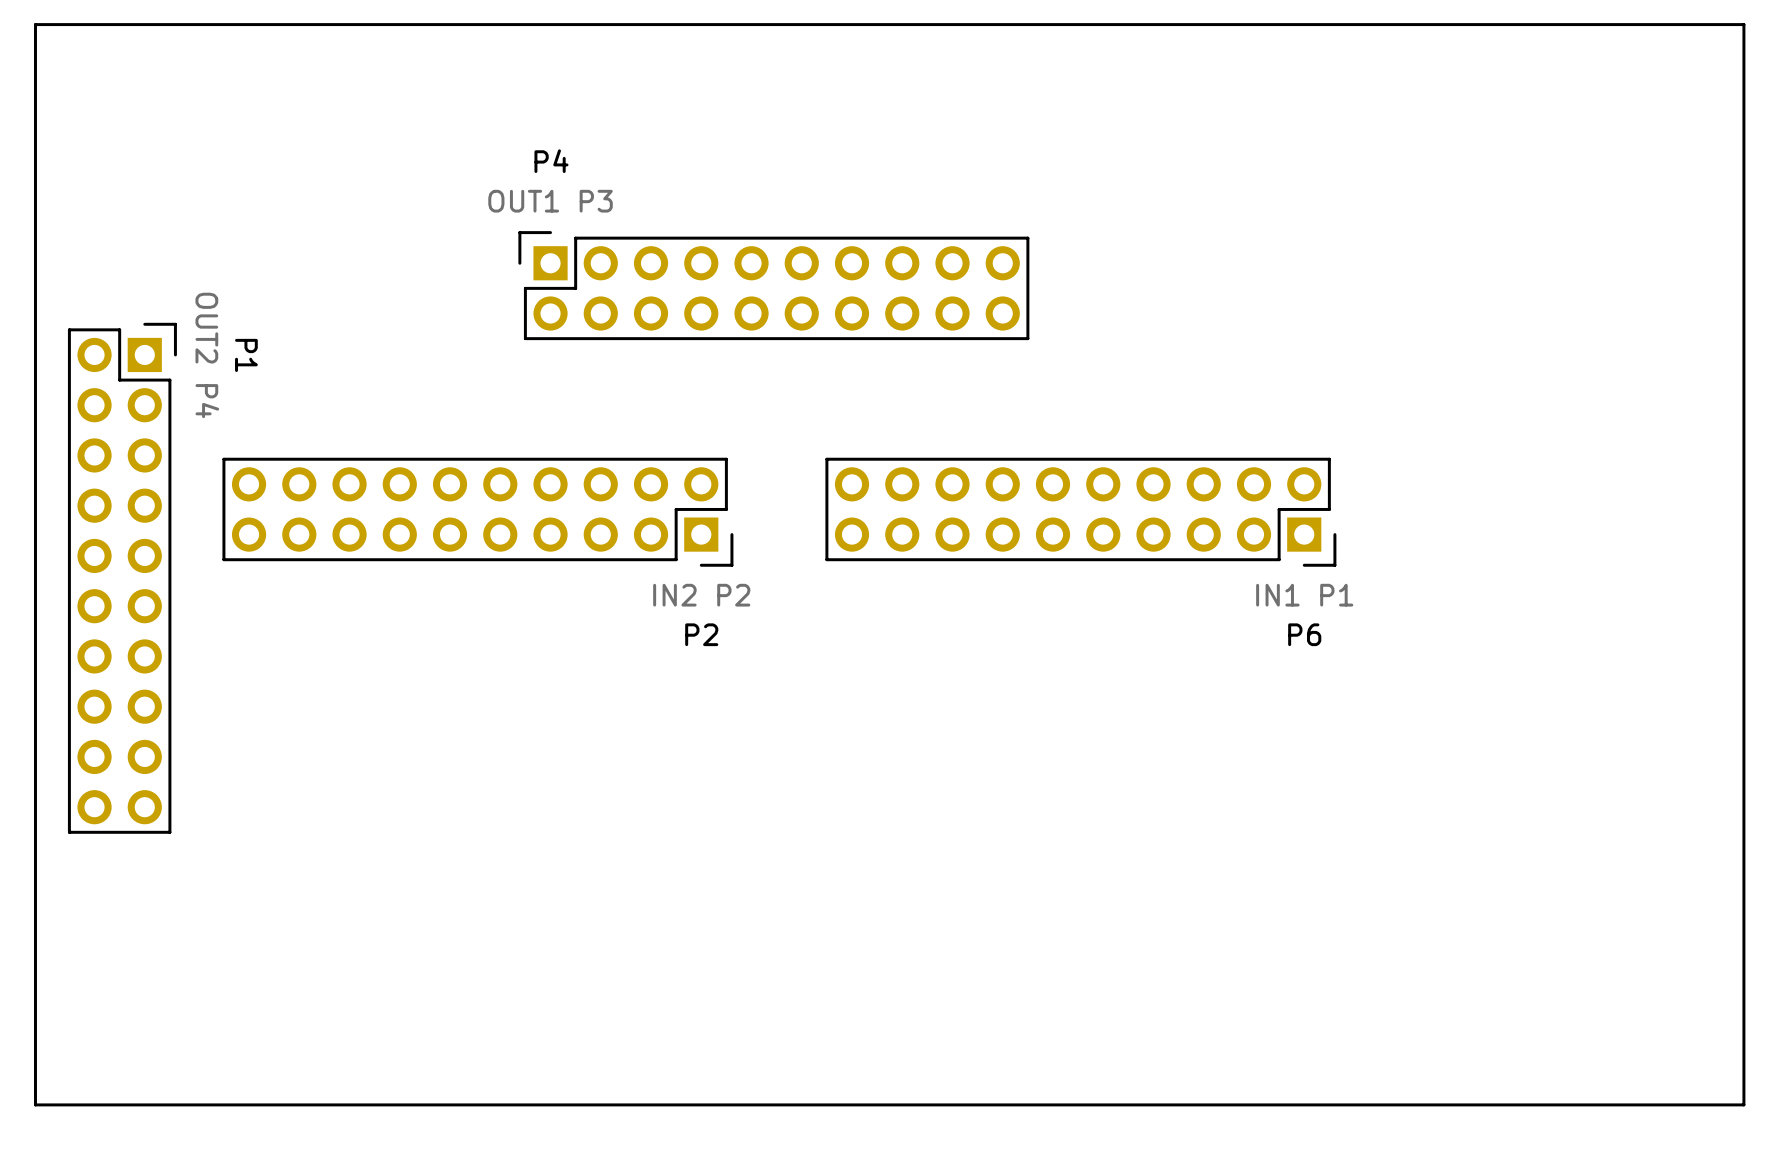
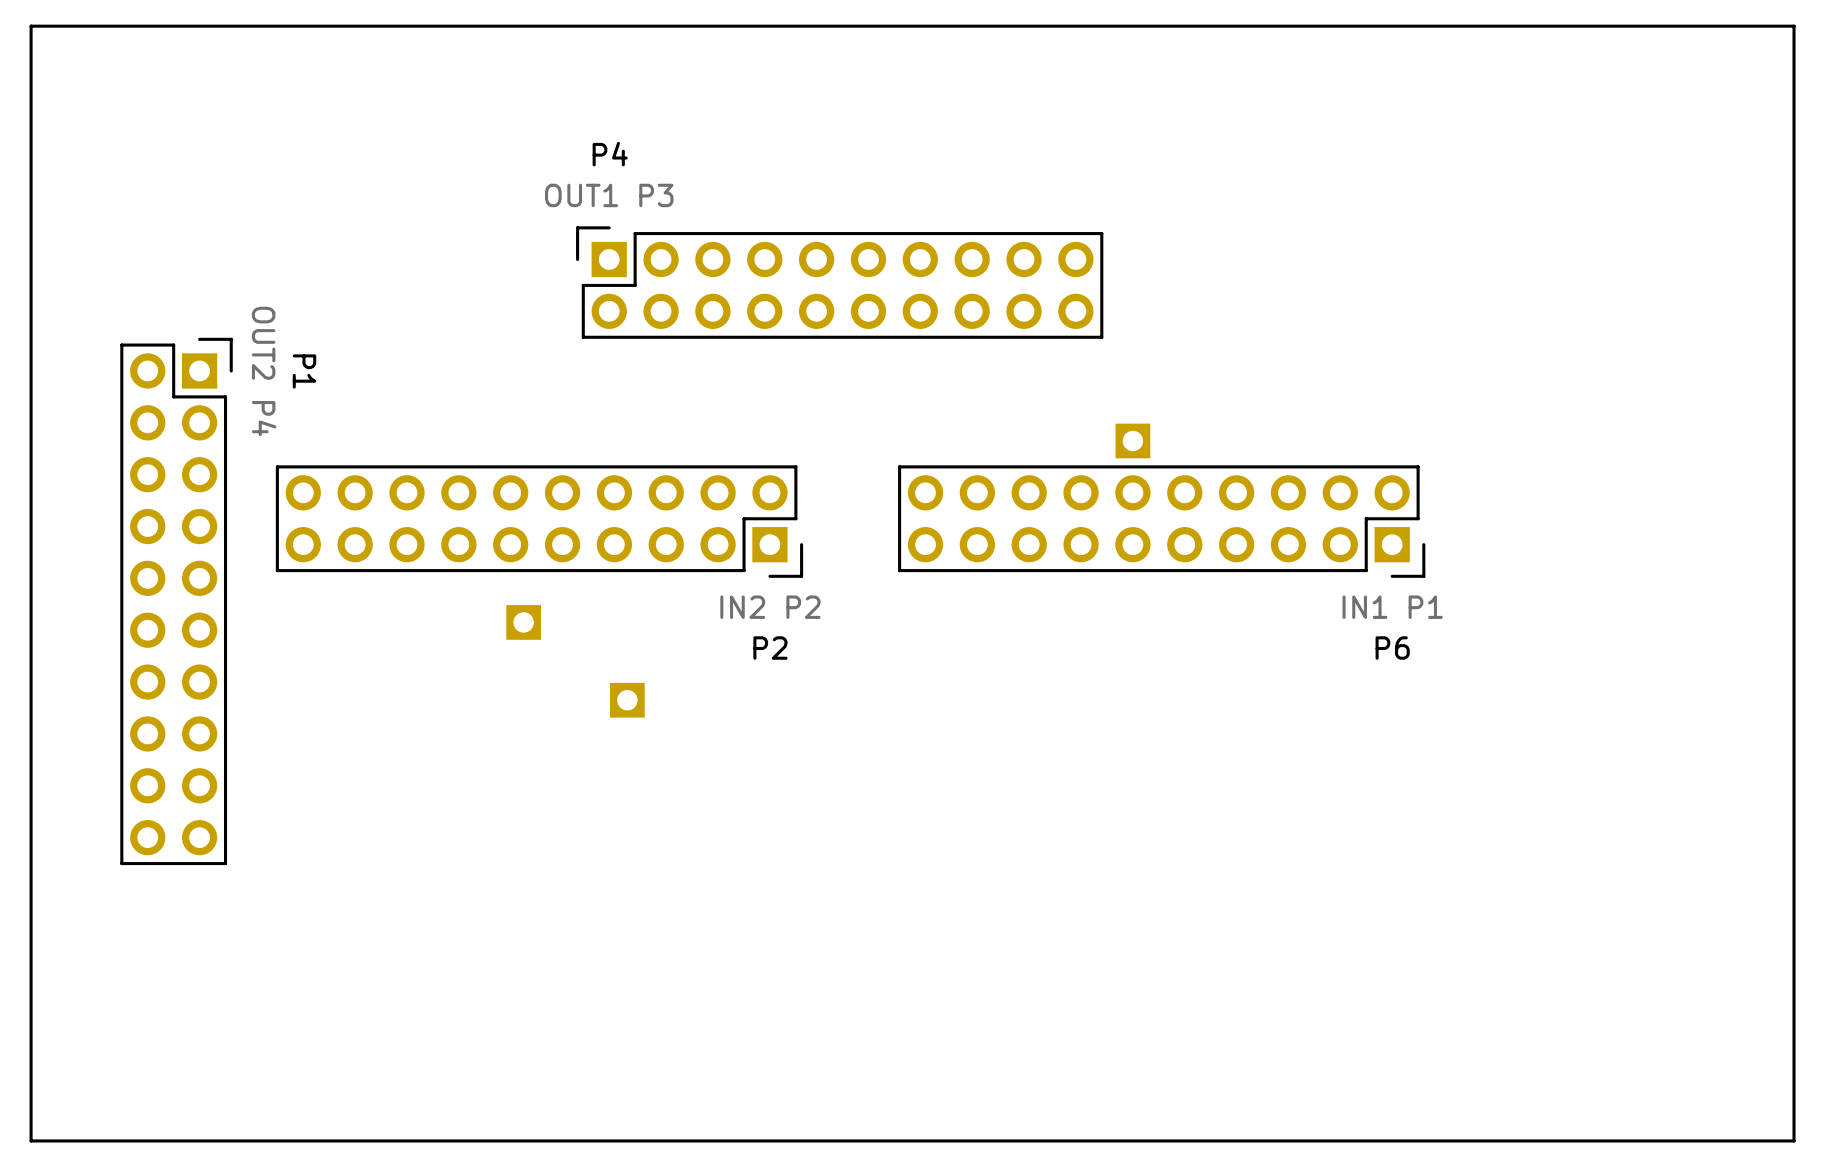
P4 position: (773, 285) -> (839, 282)
part: none -> (1132, 440)
P2 position: (477, 512) -> (539, 521)
P6 position: (1080, 512) -> (1161, 521)
P1 position: (122, 578) -> (176, 601)
part: none -> (523, 622)
part: none -> (627, 700)

